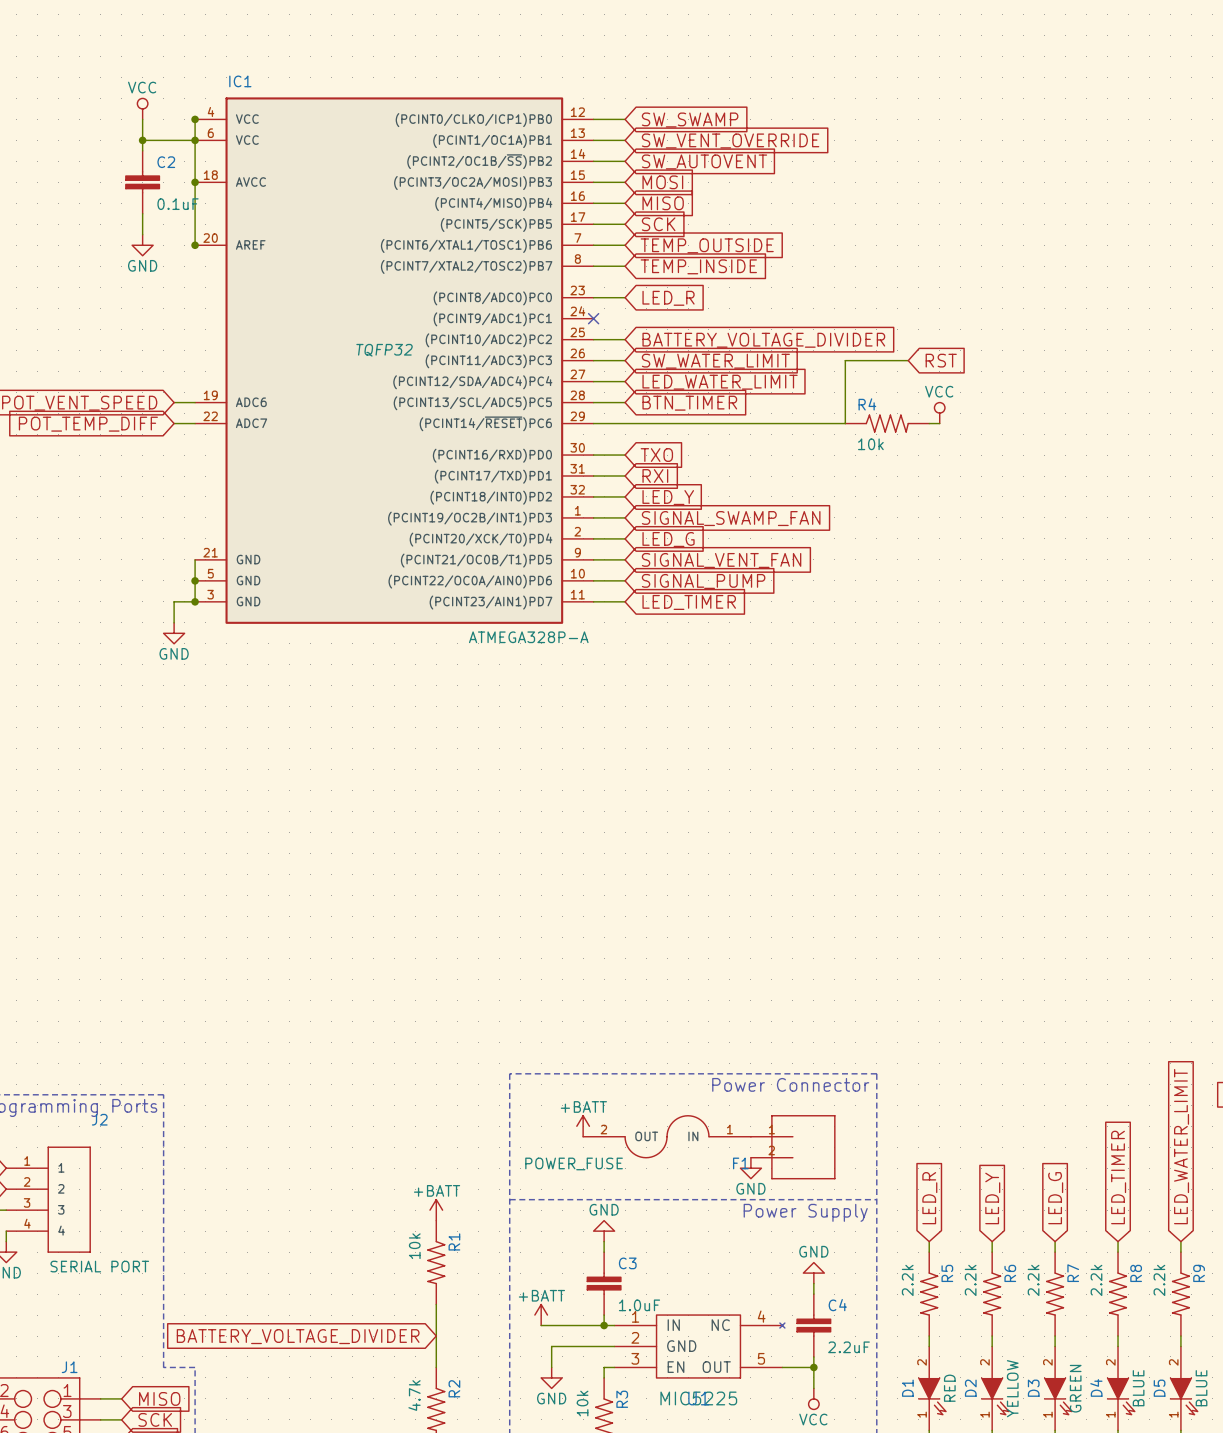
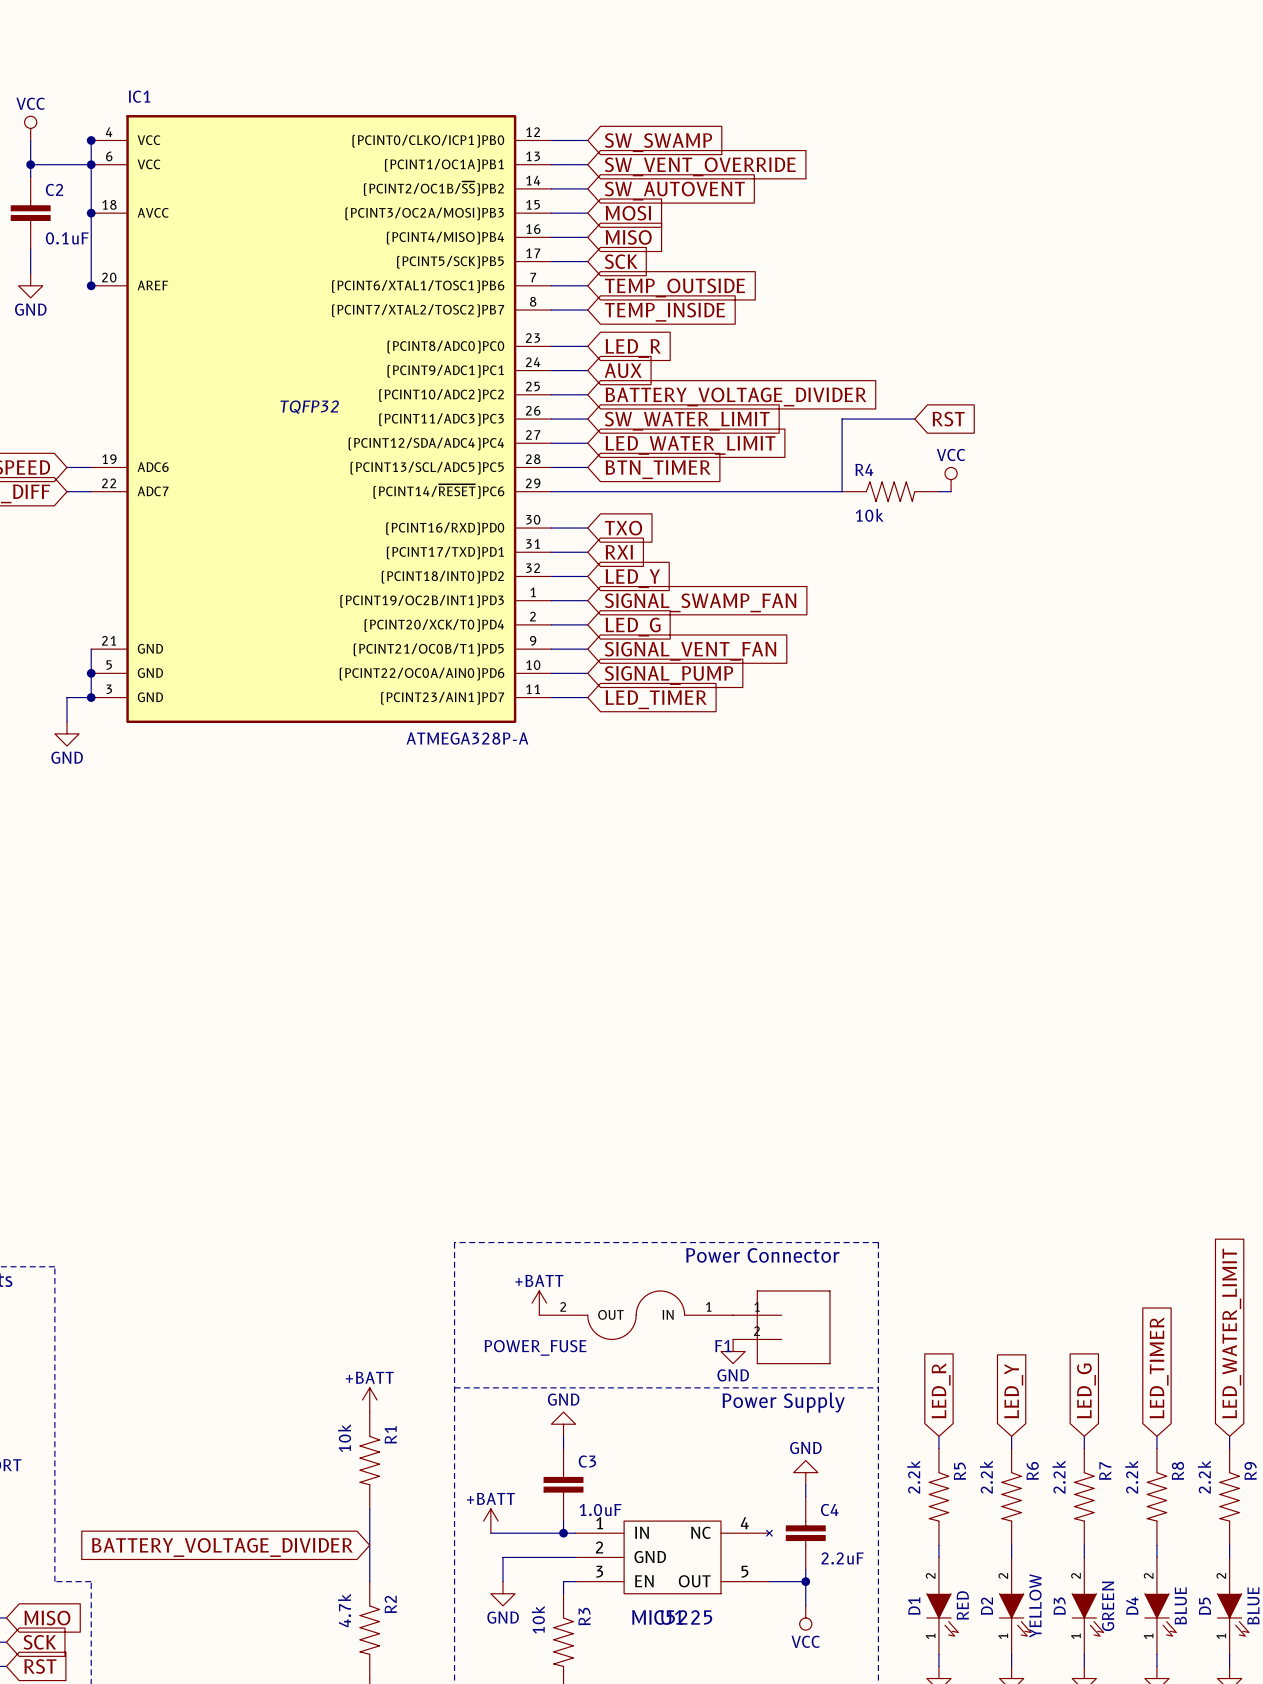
wire: none -> (551, 370) (587, 370)
no-connect mark: (593, 318) -> none
global label: none -> AUX (623, 370)

